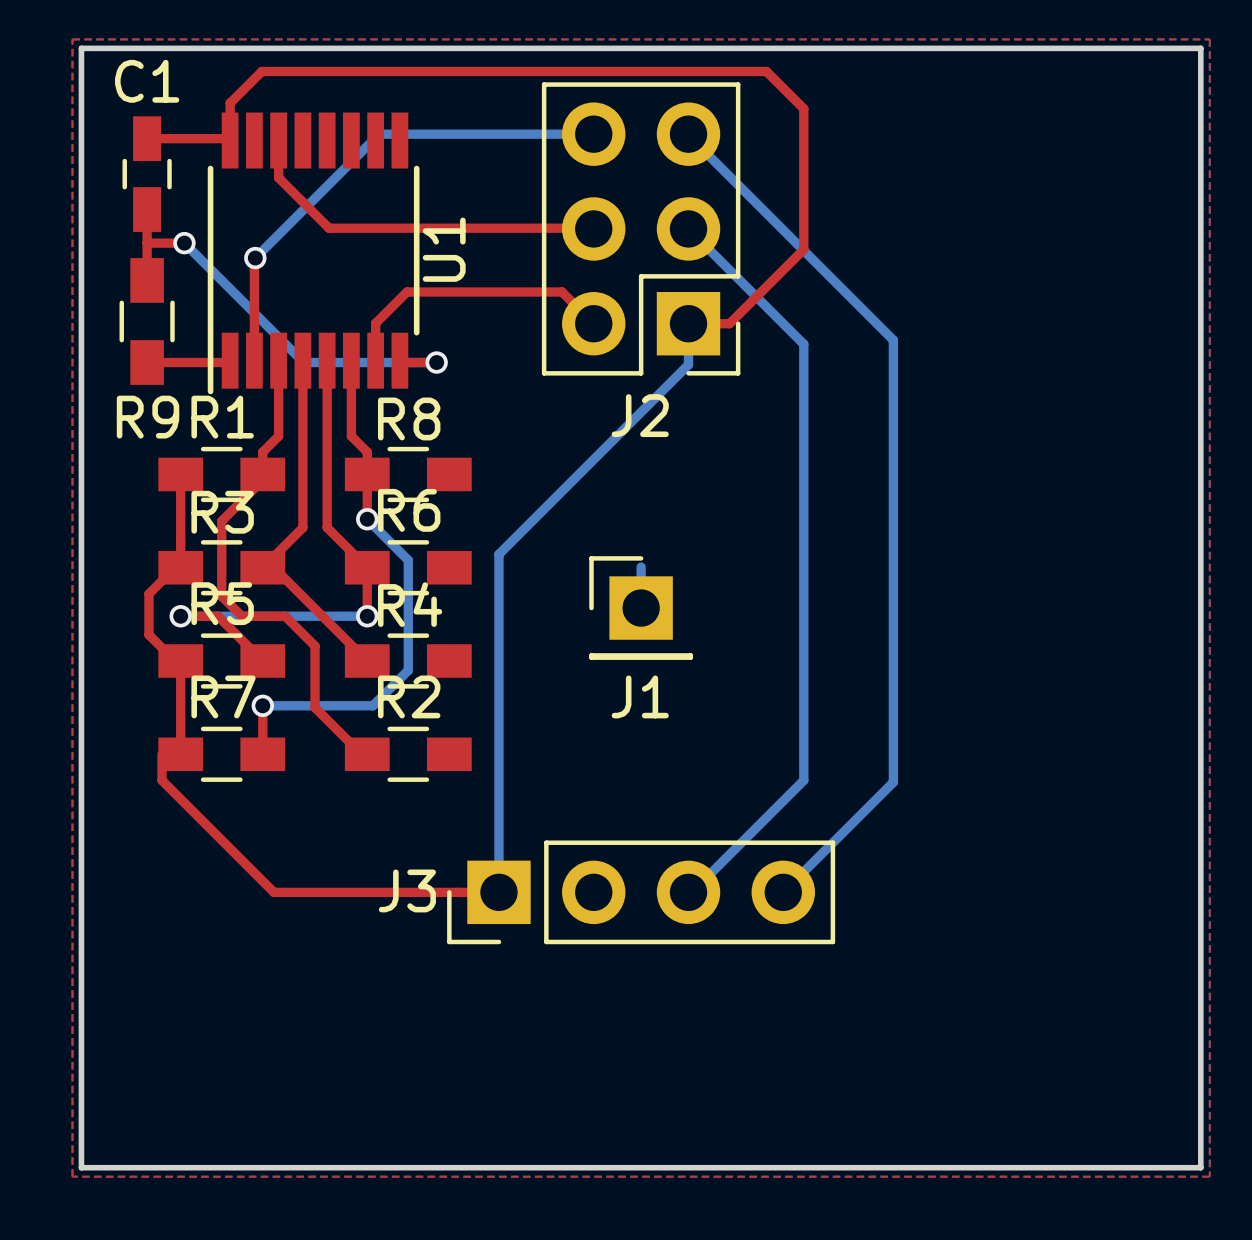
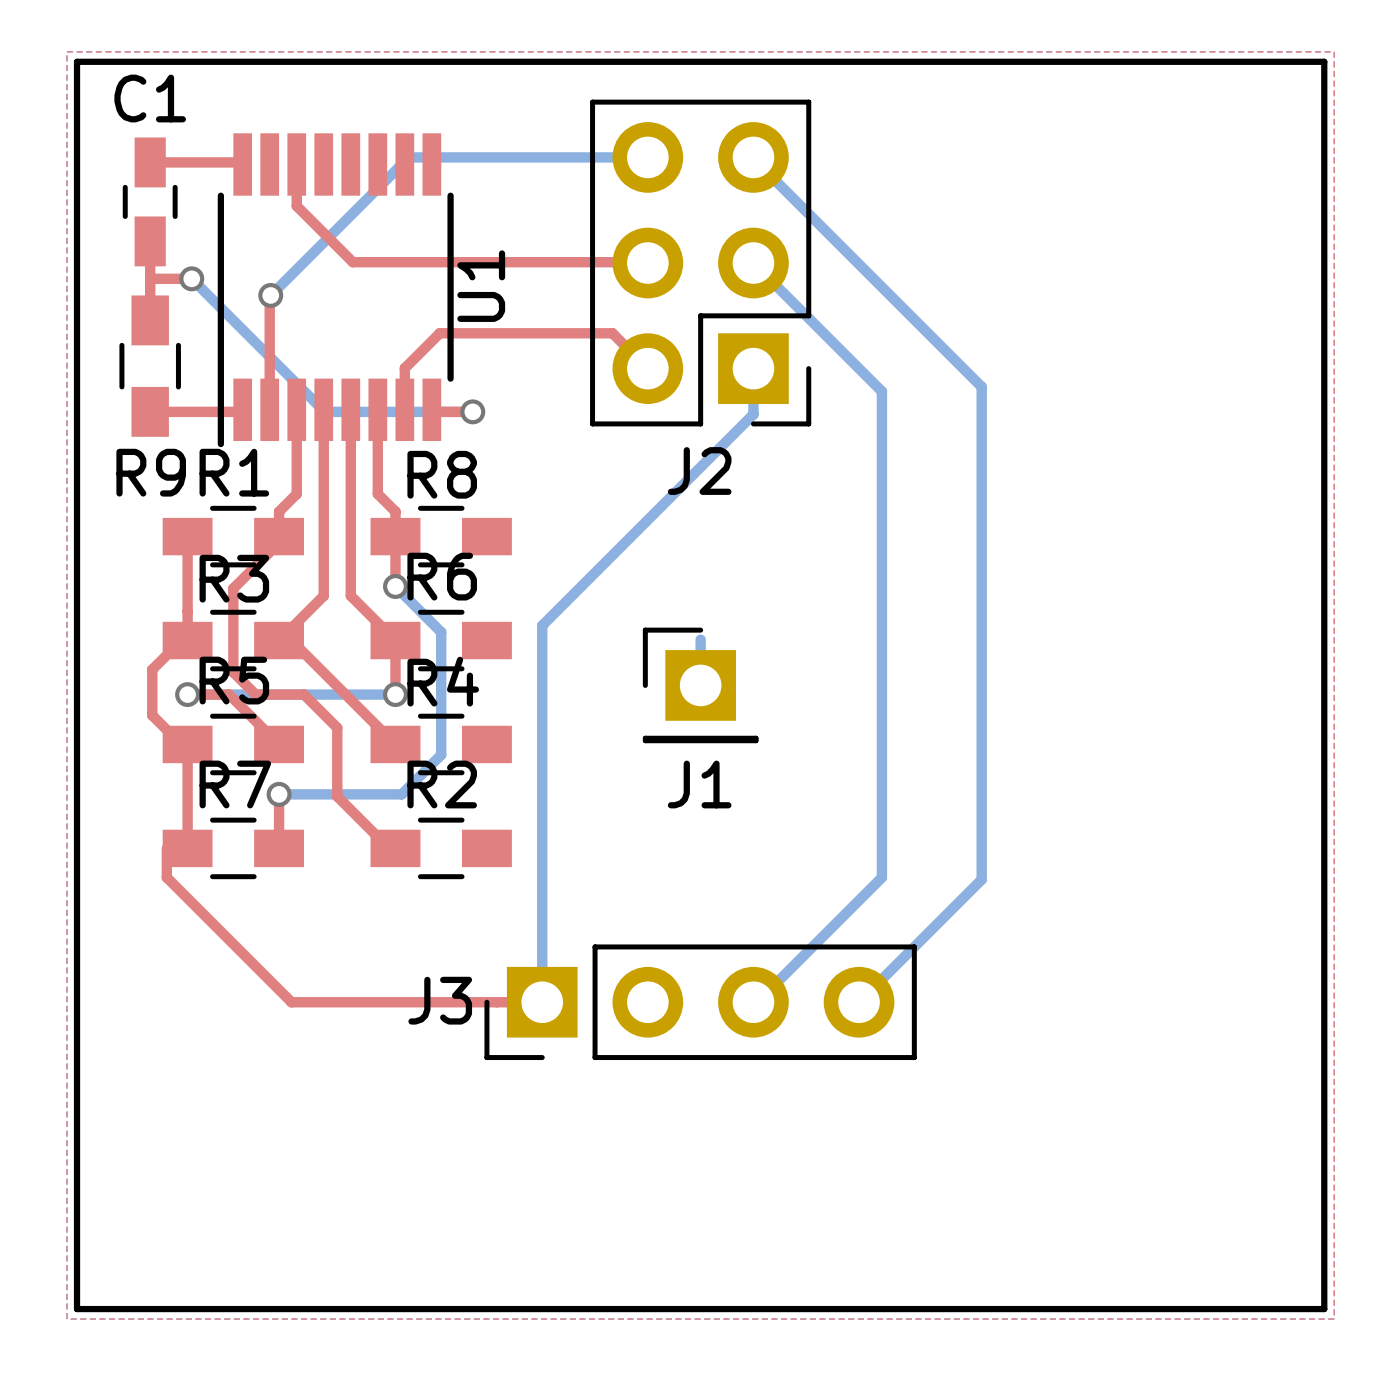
top track: (230, 140) (230, 103) (261, 71) (766, 71) (803, 108) (803, 249) (729, 323) (688, 323) -> none

